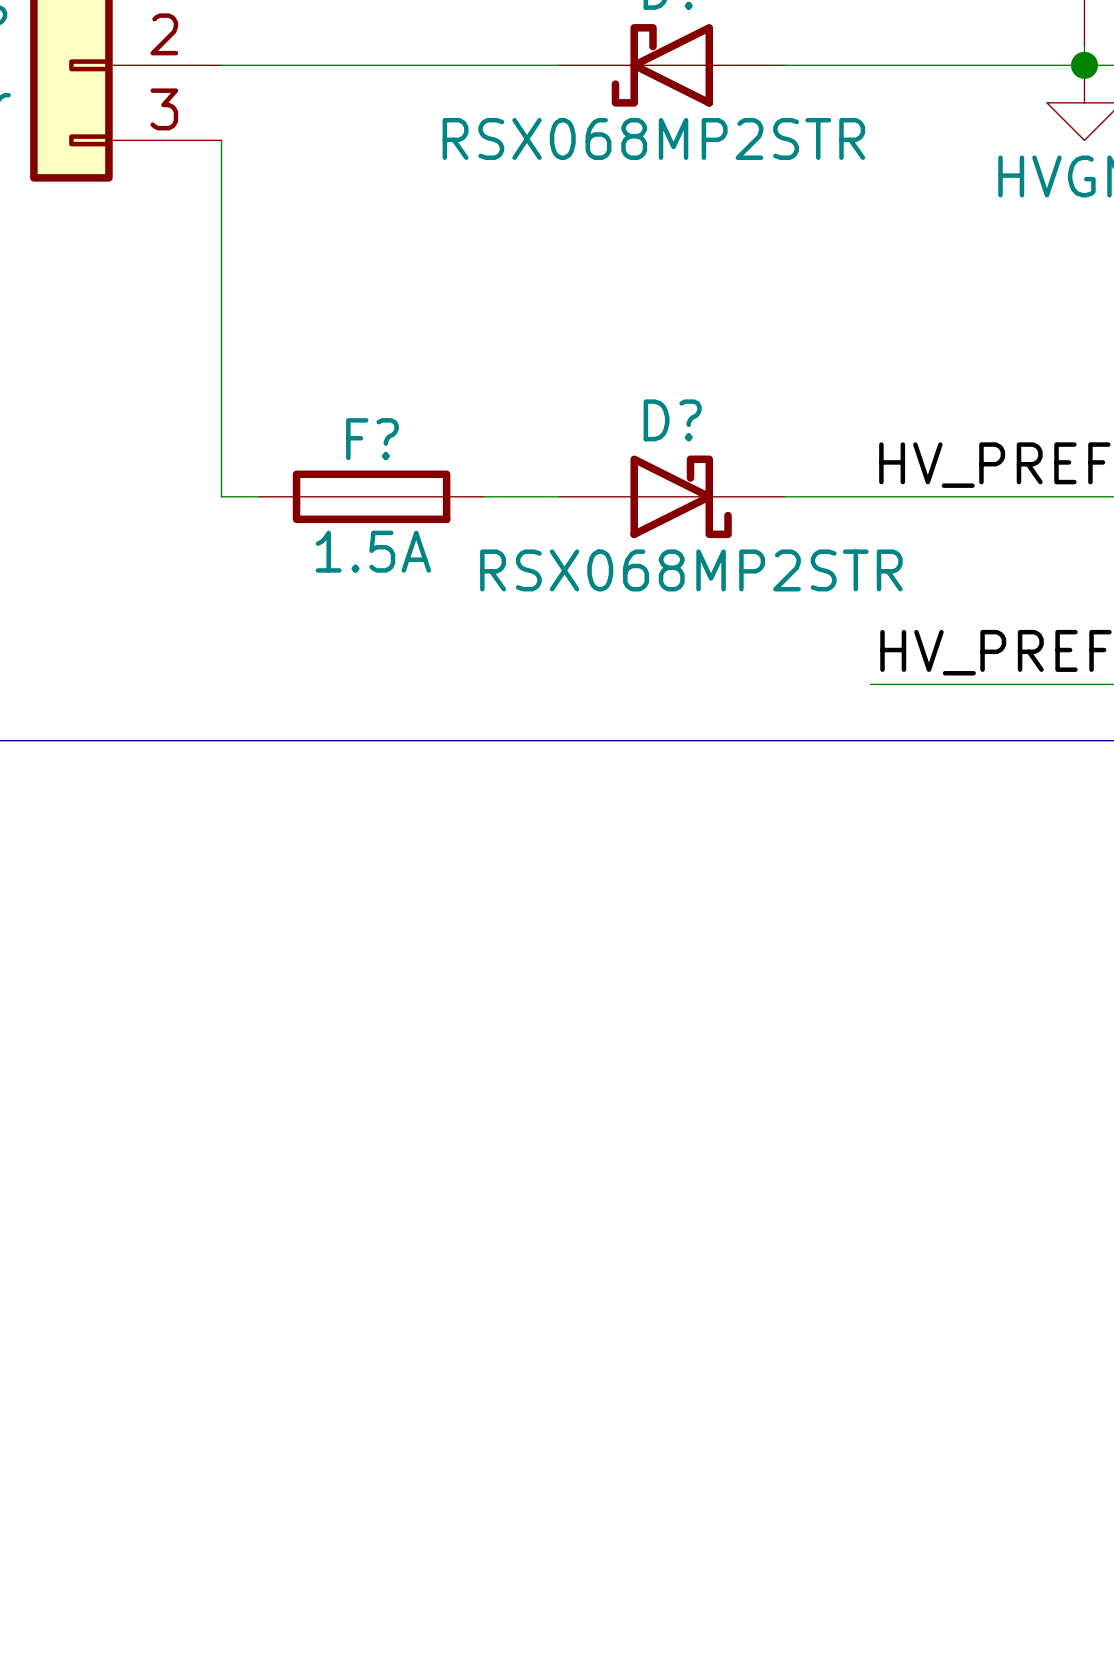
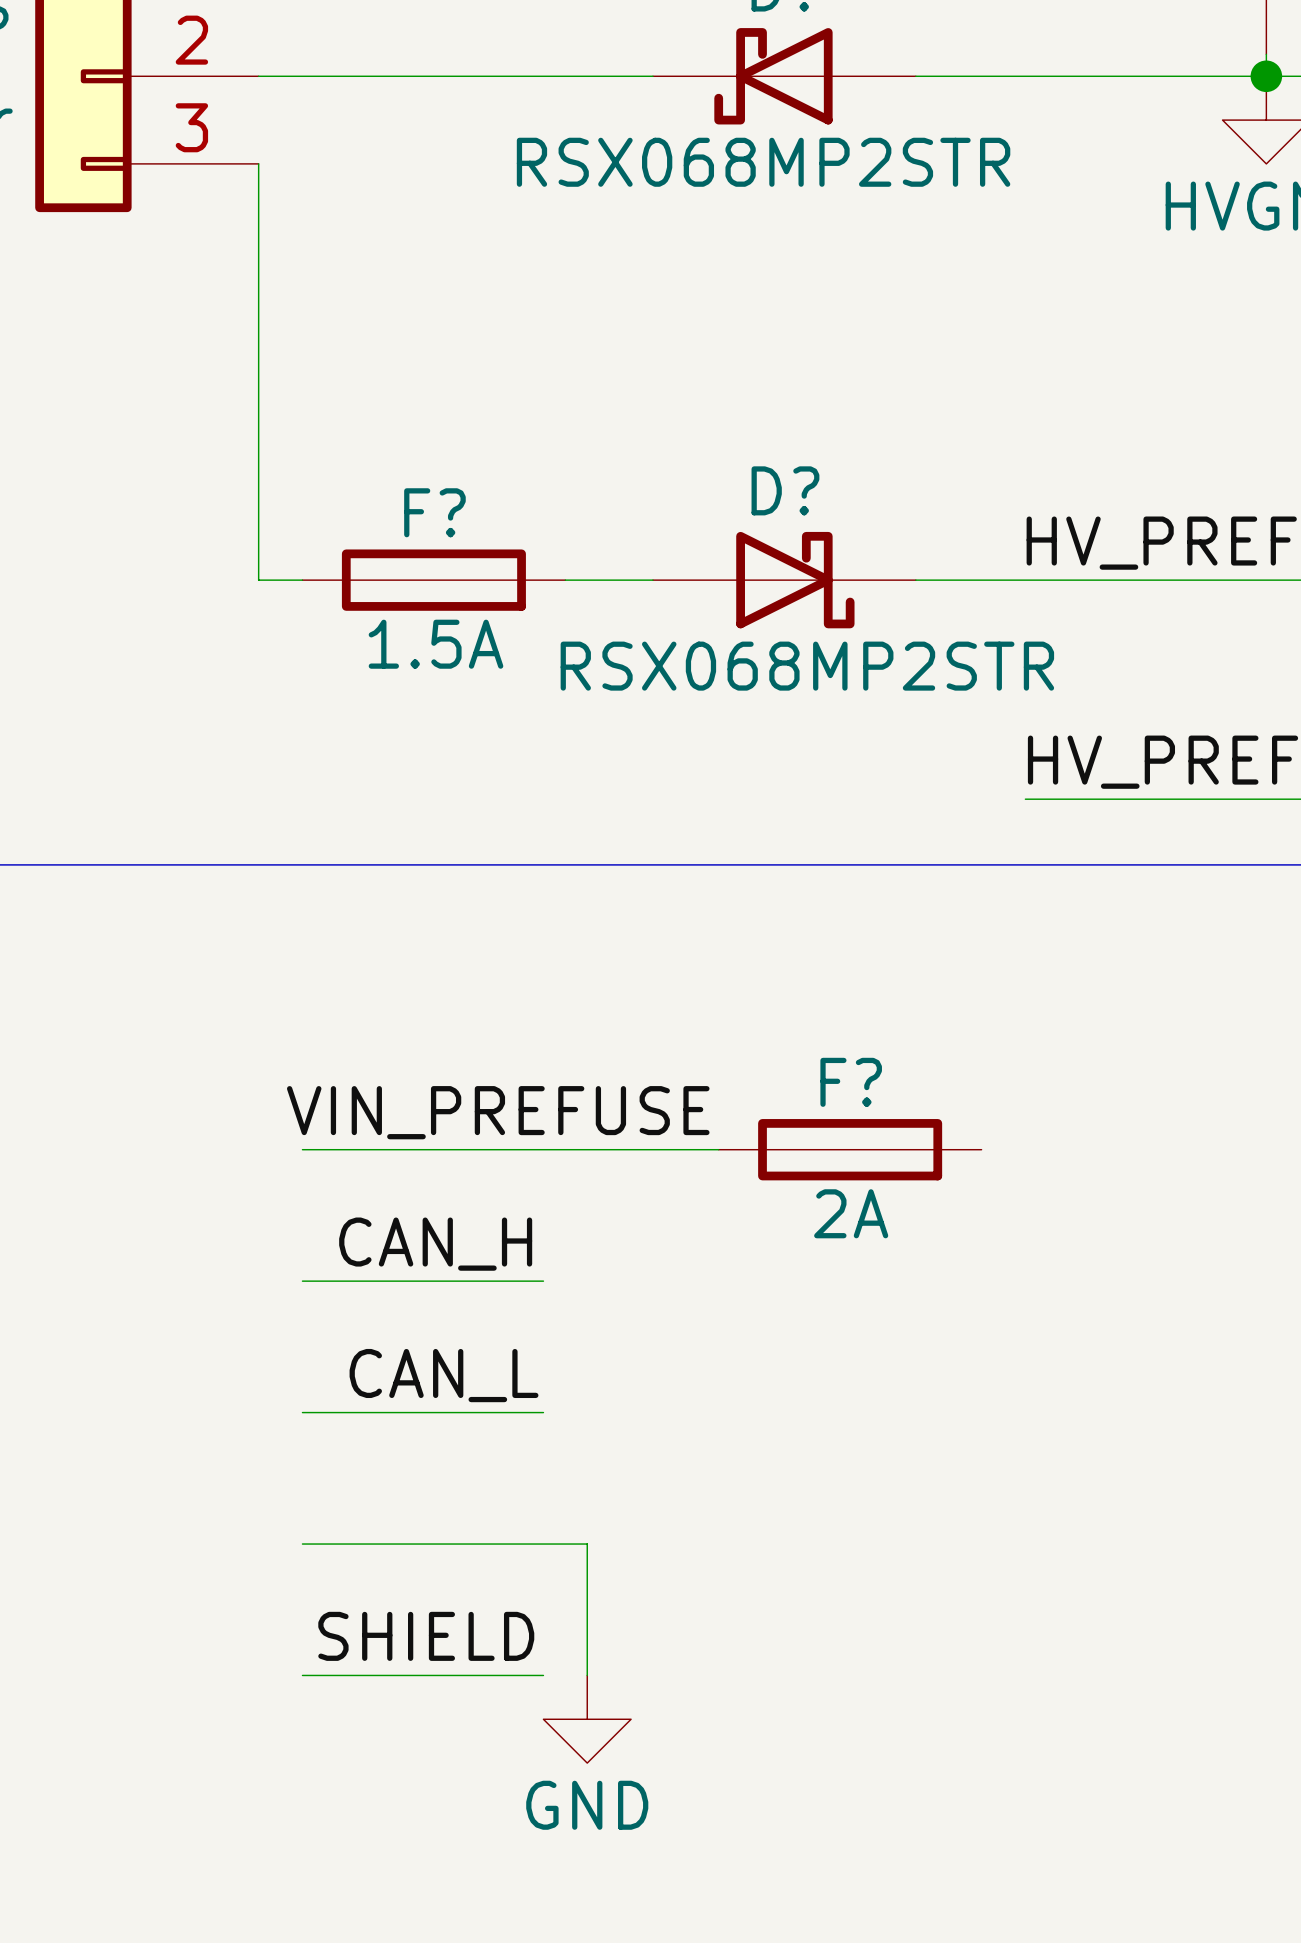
wire: (870, 684) (878, 684) -> none
label: none -> VIN_PREFUSE (498, 1112)
wire: none -> (302, 1149) (718, 1149)
F?: none -> 2A (850, 1149)
label: none -> CAN_H (435, 1244)
wire: none -> (302, 1281) (543, 1281)
label: none -> CAN_L (444, 1375)
wire: none -> (302, 1412) (543, 1412)
wire: none -> (302, 1544) (587, 1544) (587, 1675)
label: none -> SHIELD (426, 1636)
wire: none -> (302, 1675) (543, 1675)
power symbol: none -> GND (587, 1719)

